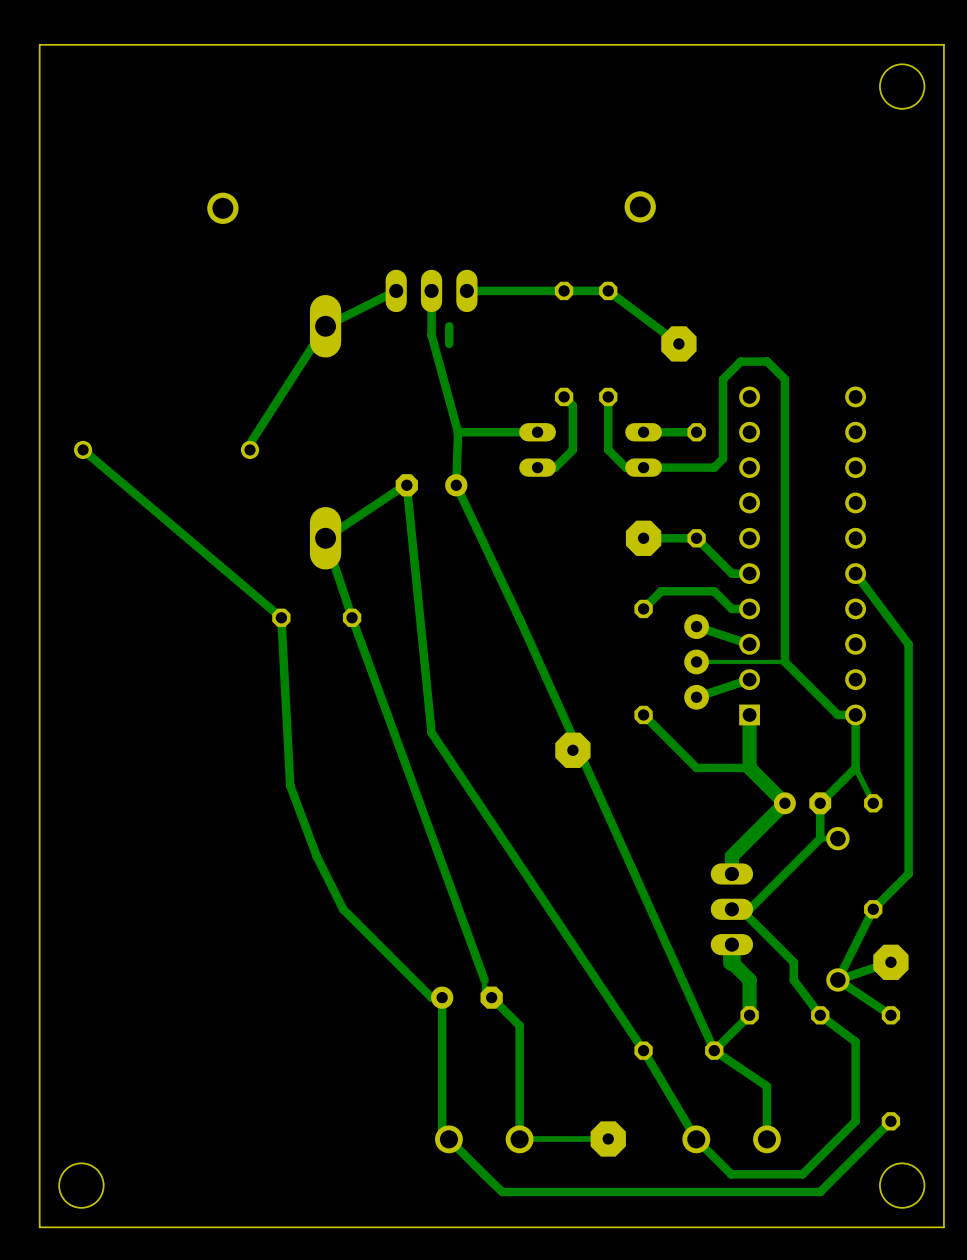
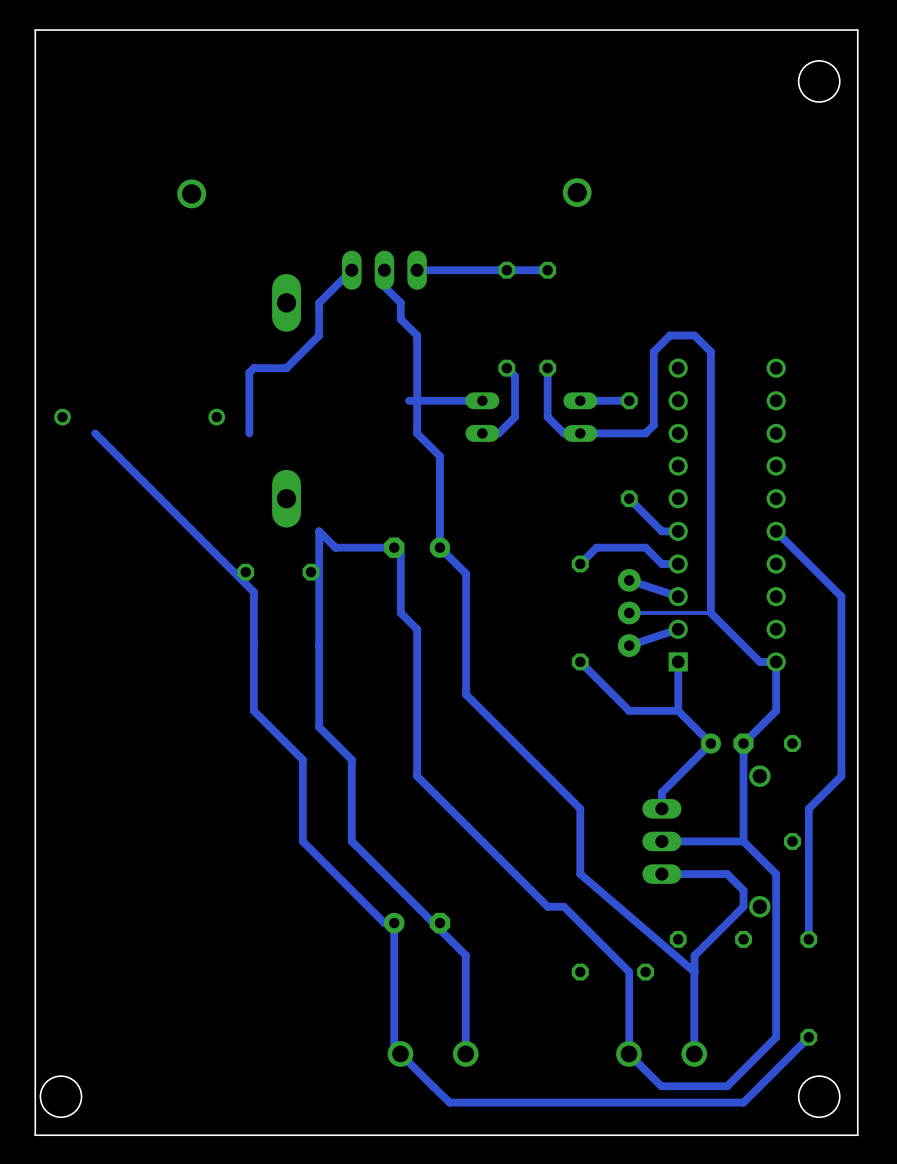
board edge: (943, 44) (39, 44) (39, 1227) (53, 1227) -> (857, 42) (857, 30) (35, 30) (35, 1135)
track: (396, 290) (325, 326) (246, 449) -> (351, 270) (319, 302) (319, 335) (286, 368) (253, 368) (249, 372) (249, 433)
track: (608, 290) (678, 343) -> none
track: (431, 308) (431, 335) (458, 432) (456, 485) (519, 619) (714, 1050) -> (384, 286) (400, 302)
track: none -> (400, 319) (417, 335) (417, 433) (439, 456) (439, 547) (466, 573) (466, 694) (580, 808) (580, 874) (694, 972)
part: (678, 343) -> none
track: (83, 449) (281, 617) (290, 785) (316, 856) (343, 909) -> (95, 433) (253, 592) (253, 710) (302, 759) (302, 841)
track: (405, 485) (325, 538) (352, 617) (484, 979) (484, 990) (519, 1025) (519, 1032) -> none
track: (406, 485) (431, 732) (643, 1050) (696, 1139) -> (465, 955) (351, 841) (351, 759) (319, 727) (319, 531) (335, 547) (394, 547) (400, 554) (400, 612) (417, 629) (417, 776) (547, 906) (563, 906) (629, 972) (629, 1053)
part position: (431, 485) -> (417, 547)
part: (643, 538) -> none
track: (696, 538) (643, 538) -> none
track: (855, 573) (908, 644) (908, 873) (873, 909) (837, 979) -> (776, 531) (841, 596) (841, 776) (808, 808) (808, 939)
track width: thick (749, 714) (749, 767) (784, 803) (731, 856) (731, 873) -> thin (678, 661) (678, 710) (710, 743) (661, 792) (661, 808)
part: (572, 750) -> none
track: (855, 767) (873, 803) -> none
track: none -> (743, 776) (743, 841)
track: (837, 838) (820, 838) (745, 913) -> none
track: (740, 909) (793, 962) (793, 979) (820, 1015) (855, 1041) -> (743, 841) (776, 874) (776, 963)
track: none -> (743, 841) (670, 841)
track: (731, 944) (731, 962) (749, 979) (749, 1015) (714, 1050) -> (661, 874) (727, 874) (743, 890) (743, 906) (694, 955) (694, 972)
track: (890, 962) (837, 979) -> none
part: (890, 962) -> none
track: (837, 979) (890, 1015) -> none
track: (714, 1050) (766, 1086) -> (694, 972) (694, 1004)
track: (608, 1138) (519, 1138) -> none
part: (608, 1138) -> none

